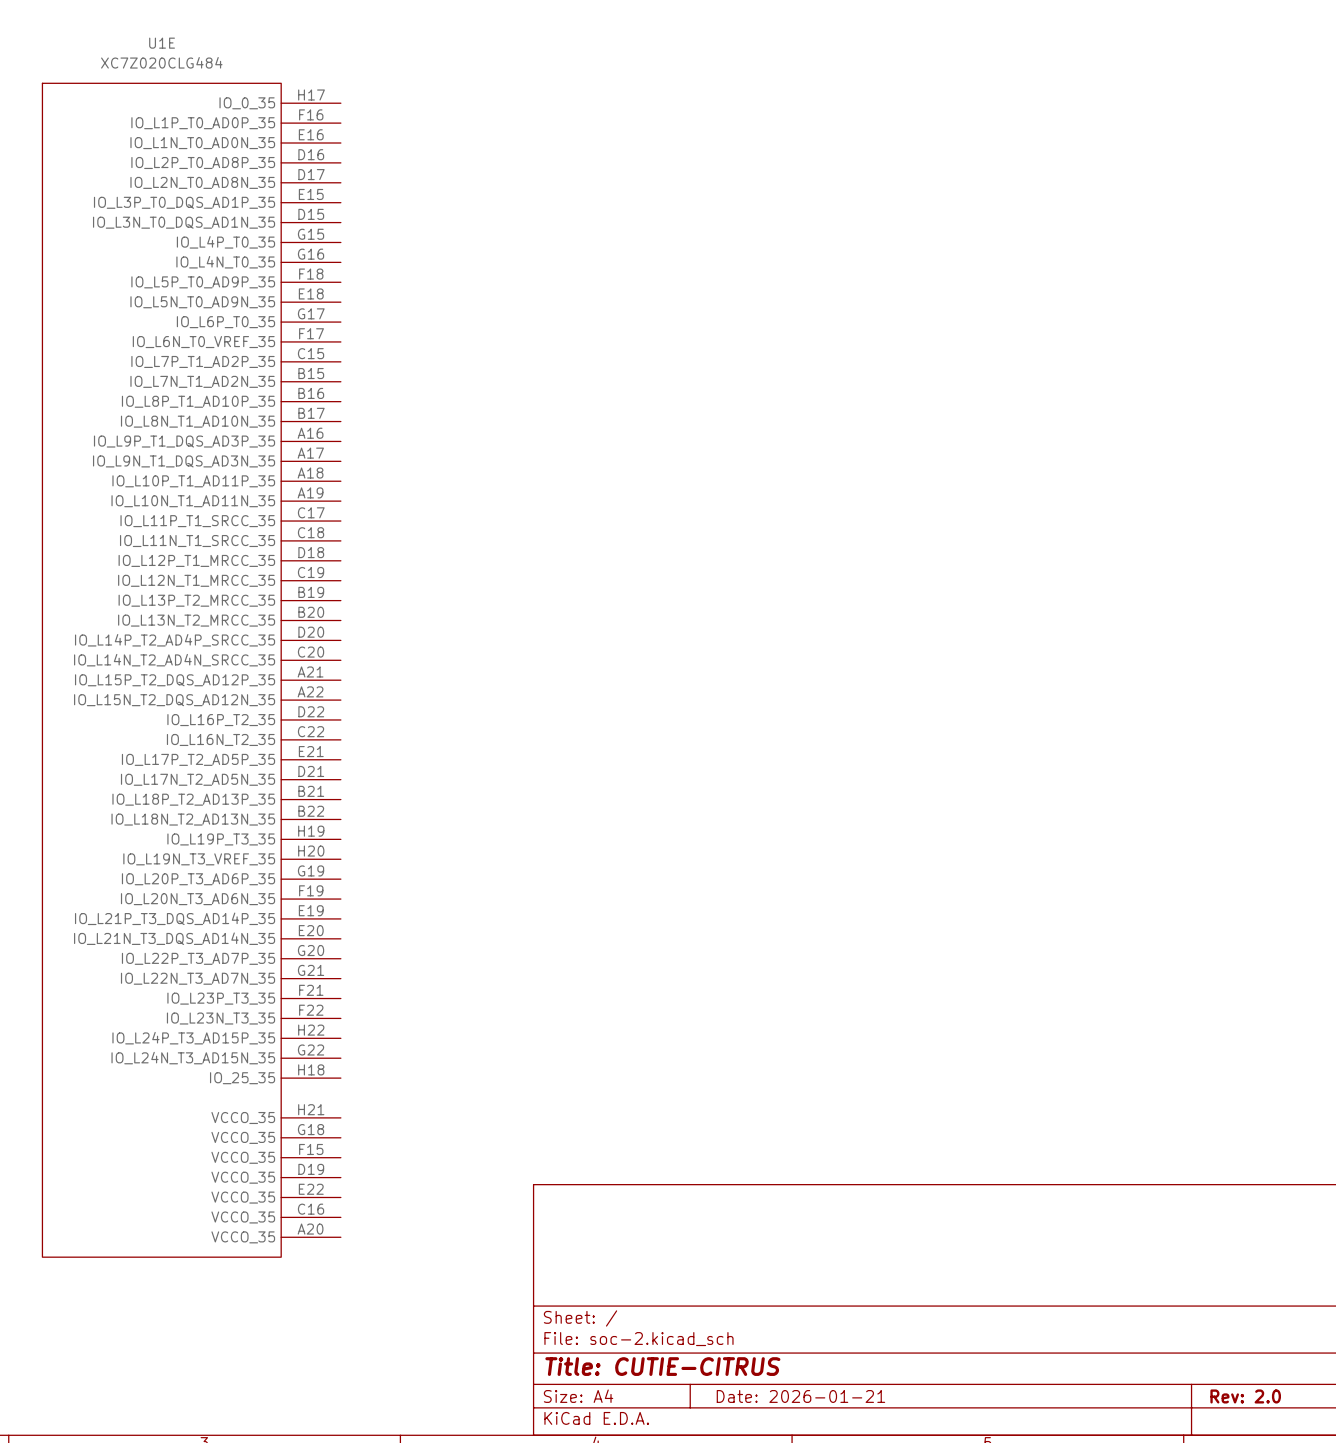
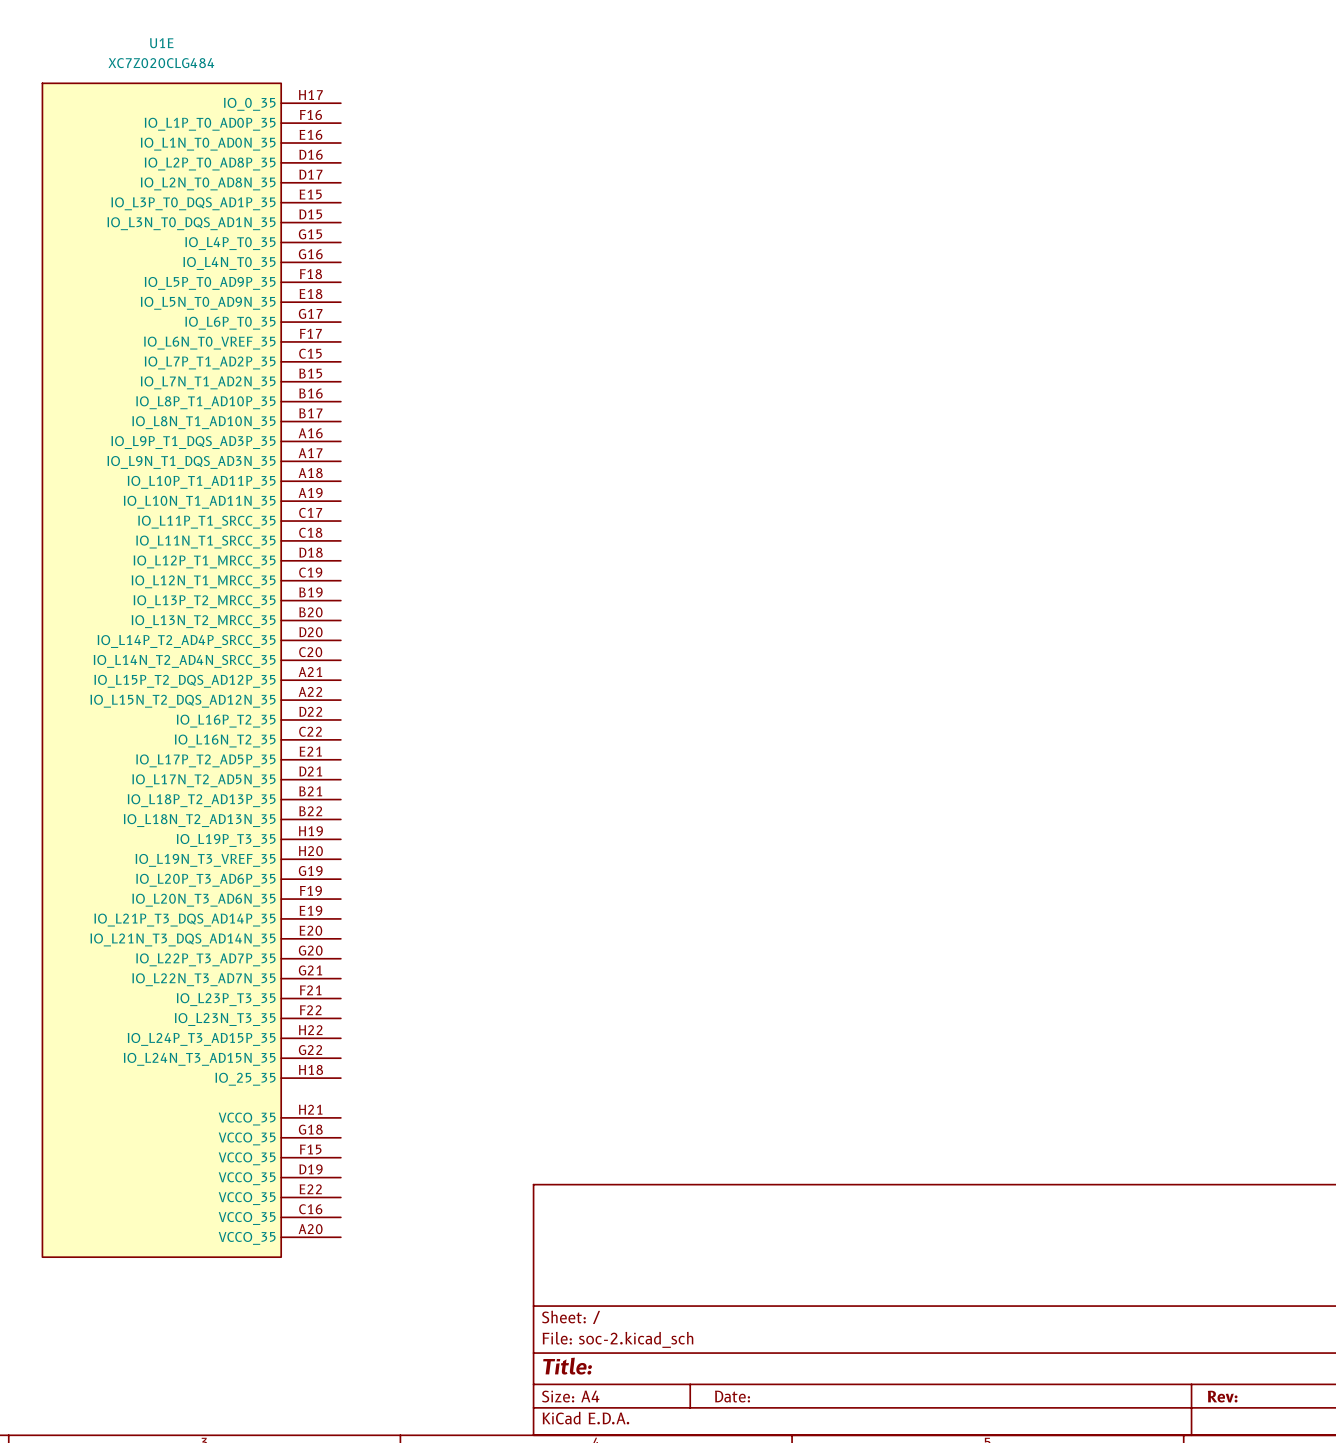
title block: Title: CUTIE-CITRUS (662, 1366) -> Title: (567, 1366)
title block: Date: 2026-01-21 (800, 1396) -> Date: (732, 1396)
title block: Rev: 2.0 (1245, 1396) -> Rev: (1222, 1396)

